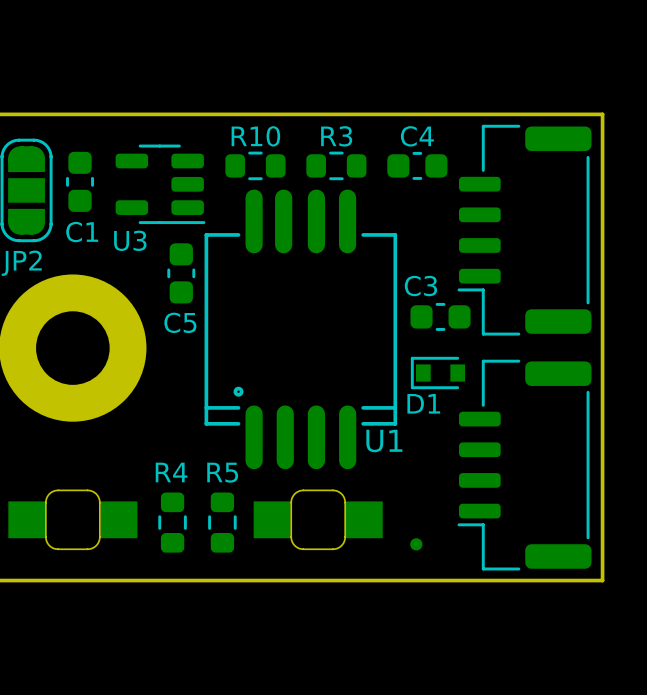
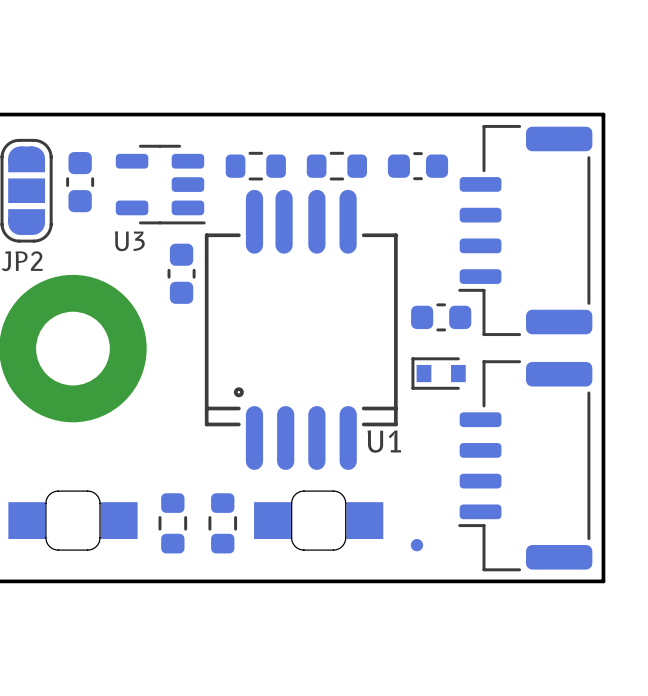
R10 name: R10 (255, 136) -> none
R3 name: R3 (336, 136) -> none
C4 name: C4 (417, 136) -> none
C1 name: C1 (82, 232) -> none
C3 name: C3 (420, 286) -> none
C5 name: C5 (180, 322) -> none
D1 name: D1 (423, 403) -> none
R4 name: R4 (171, 472) -> none
R5 name: R5 (222, 472) -> none

